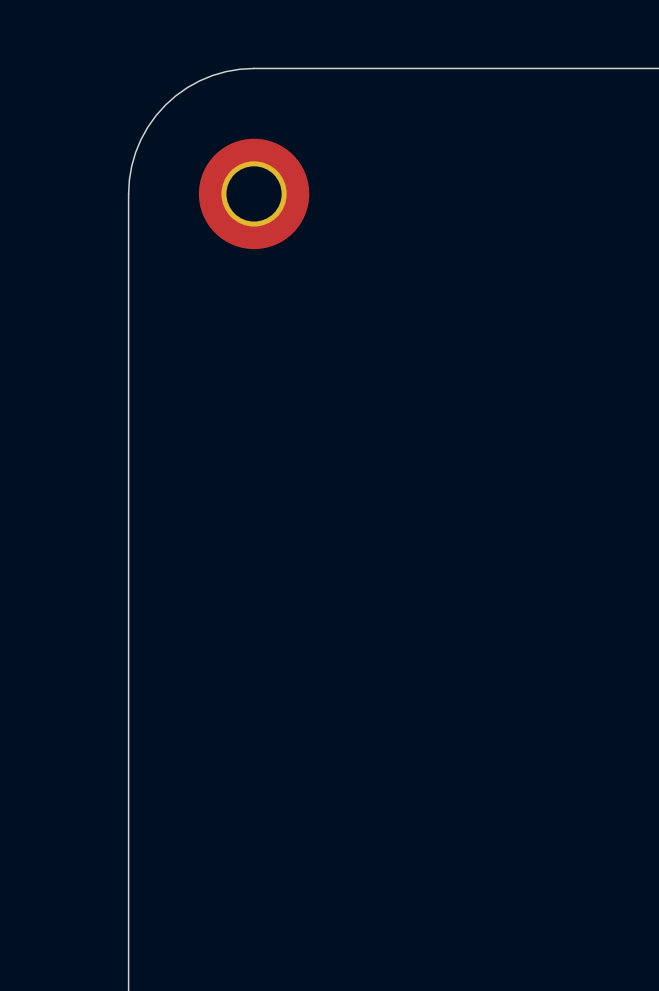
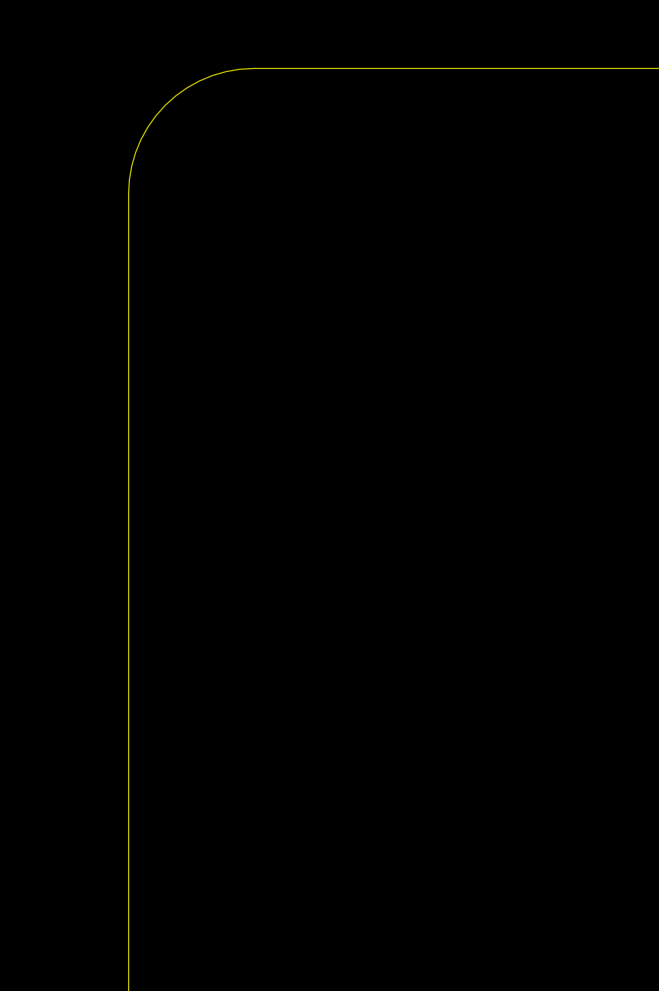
part: (254, 193) -> none

